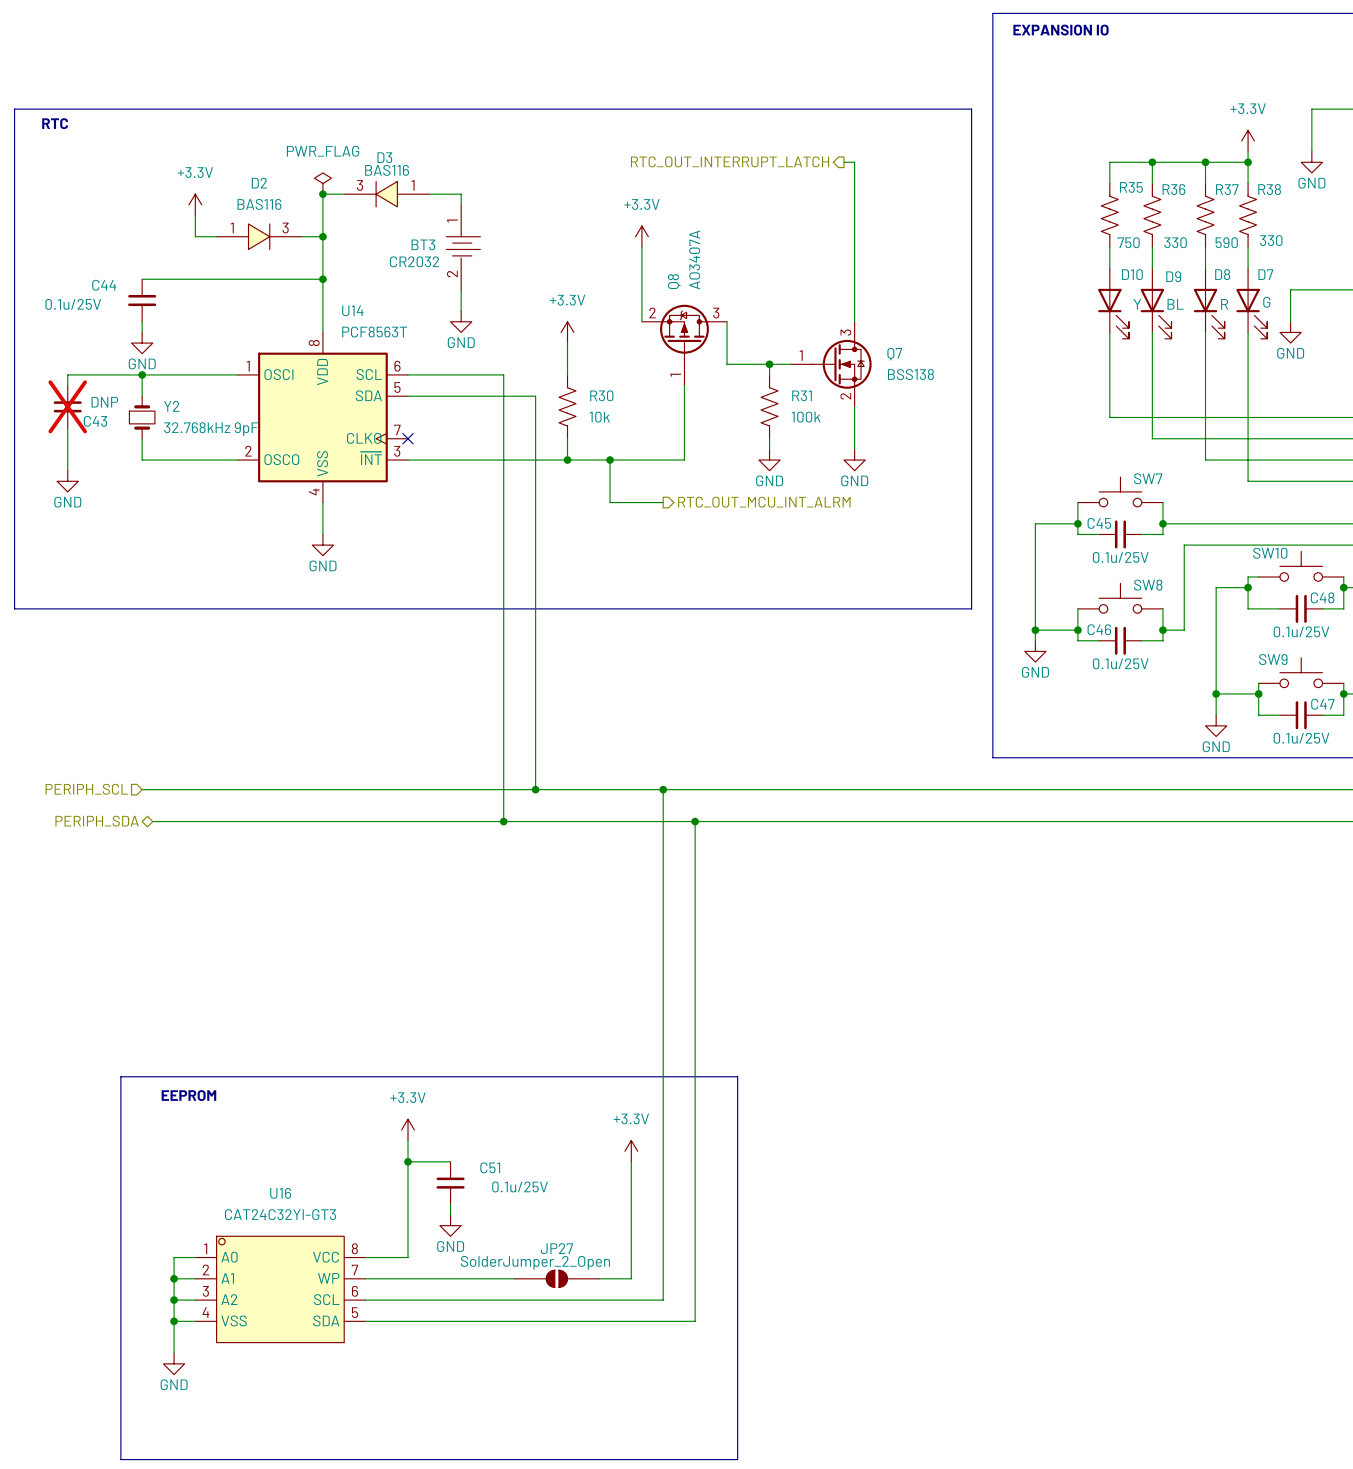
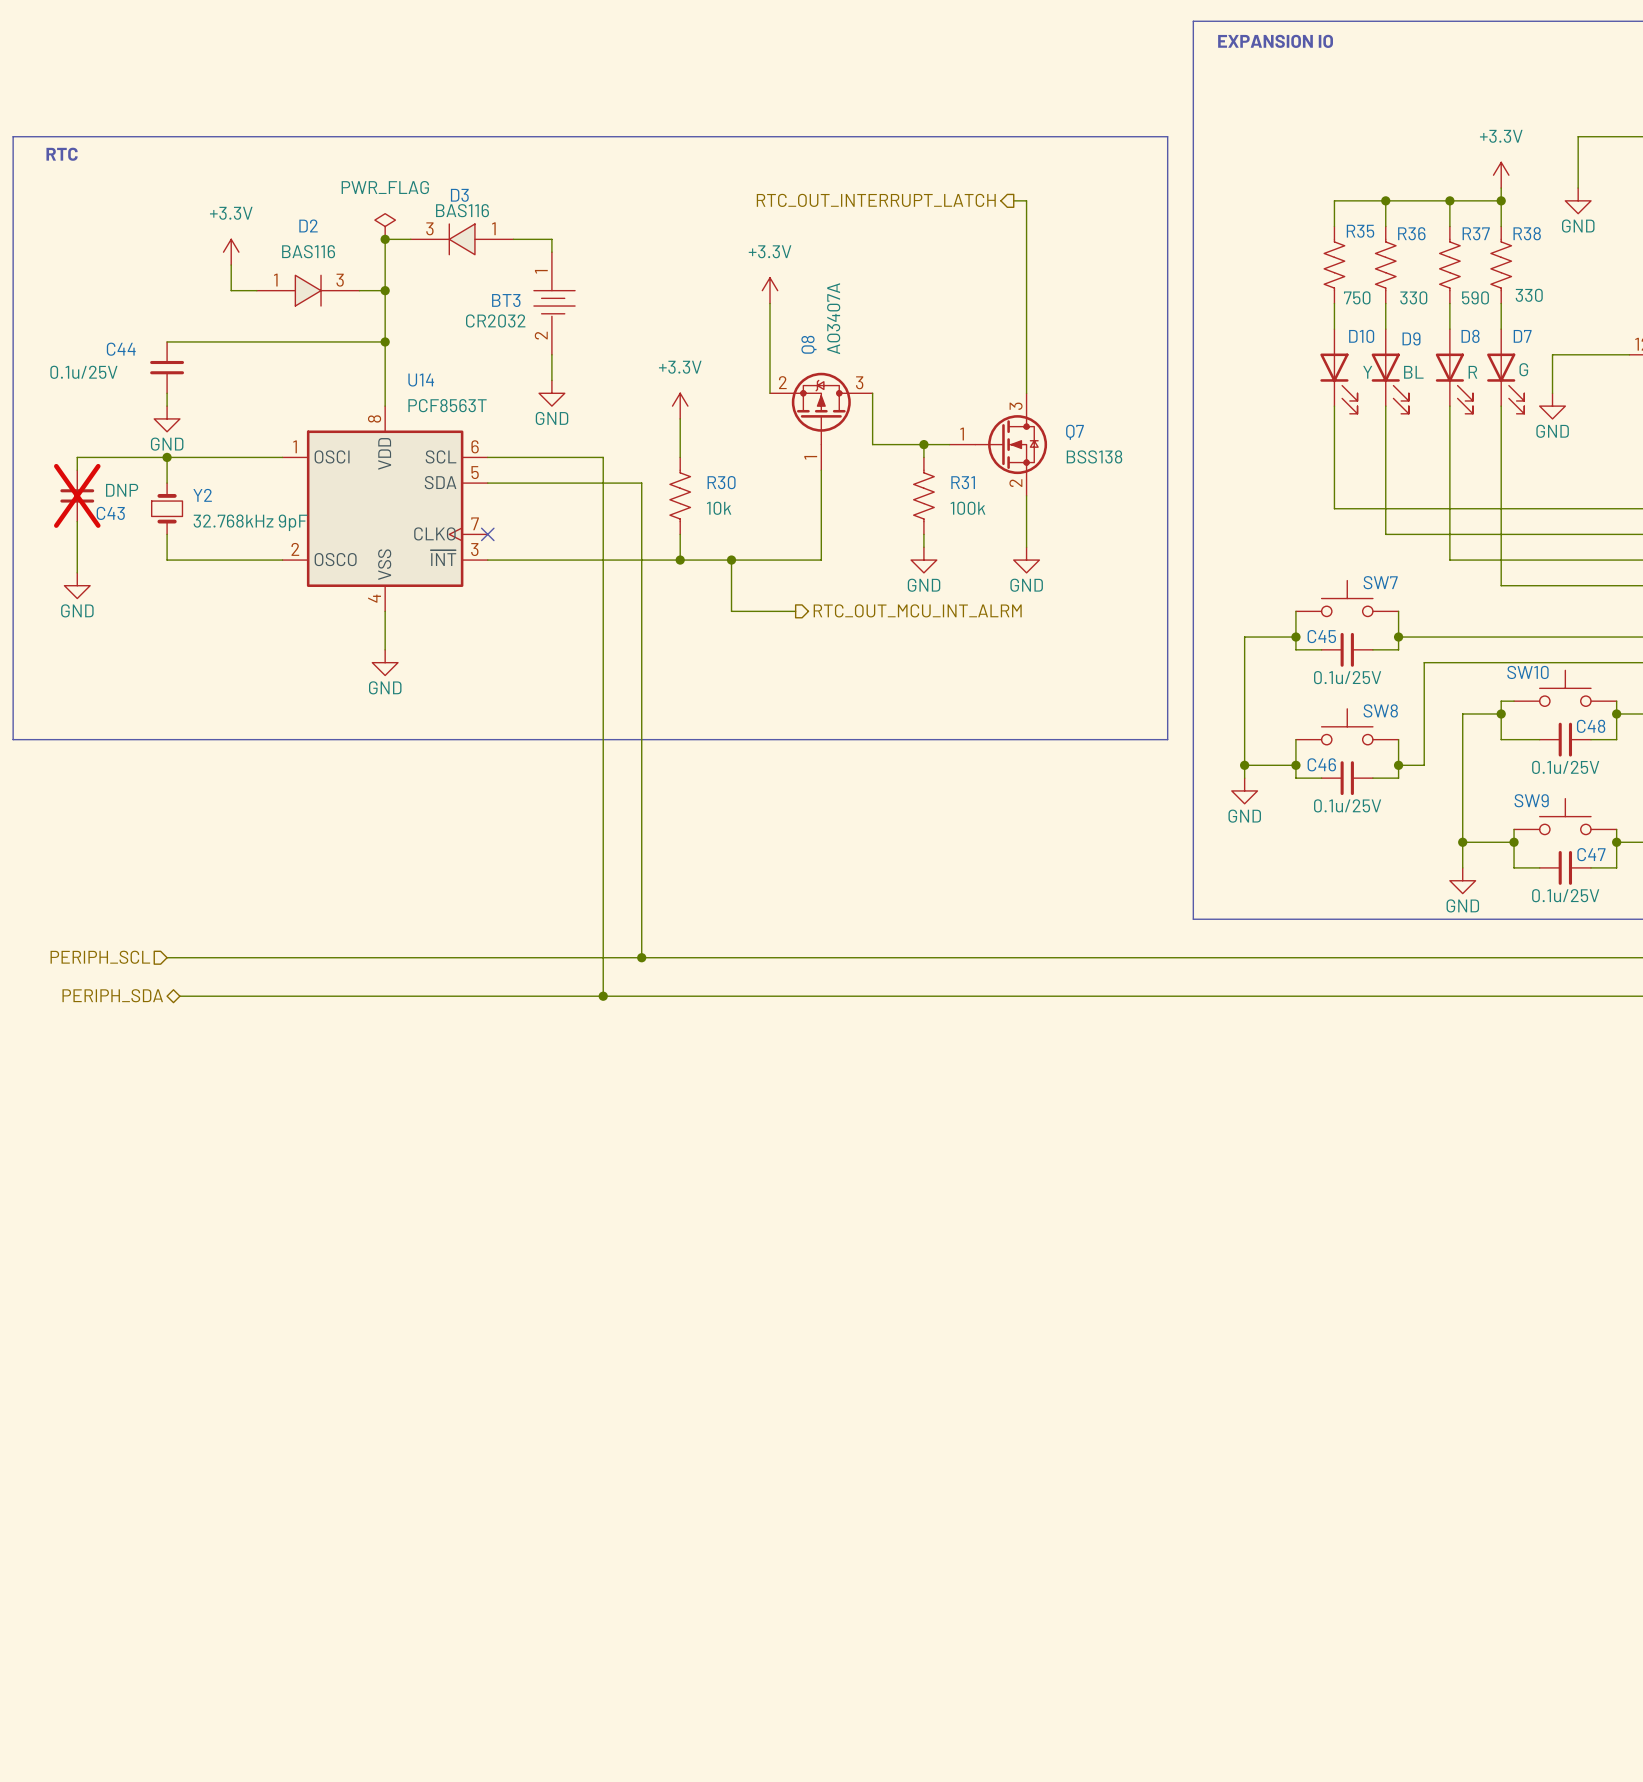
wire: (663, 789) (663, 1300) (365, 1300) -> none
junction: (663, 789) -> none
wire: (695, 821) (695, 1321) (365, 1321) -> none
junction: (695, 821) -> none
line: (120, 1076) (737, 1076) (737, 1459) (120, 1459) (120, 1076) -> none
text: EEPROM (188, 1095) -> none
power symbol: +3.3V (408, 1129) -> none
wire: (408, 1140) (408, 1257) (365, 1257) -> none
power symbol: +3.3V (631, 1151) -> none
wire: (408, 1161) (450, 1161) -> none
junction: (408, 1161) -> none
wire: (631, 1161) (631, 1278) (599, 1278) -> none
C51: 0.1u/25V (450, 1183) -> none
wire: (450, 1204) (450, 1215) -> none
power symbol: GND (450, 1225) -> none
wire: (195, 1257) (174, 1257) (174, 1353) -> none
wire: (174, 1278) (195, 1278) -> none
junction: (174, 1278) -> none
wire: (365, 1278) (514, 1278) -> none
JP27: SolderJumper_2_Open (556, 1278) -> none
U16: CAT24C32YI-GT3 (280, 1289) -> none
wire: (174, 1300) (195, 1300) -> none
junction: (174, 1300) -> none
wire: (174, 1321) (195, 1321) -> none
junction: (174, 1321) -> none
power symbol: GND (174, 1363) -> none

